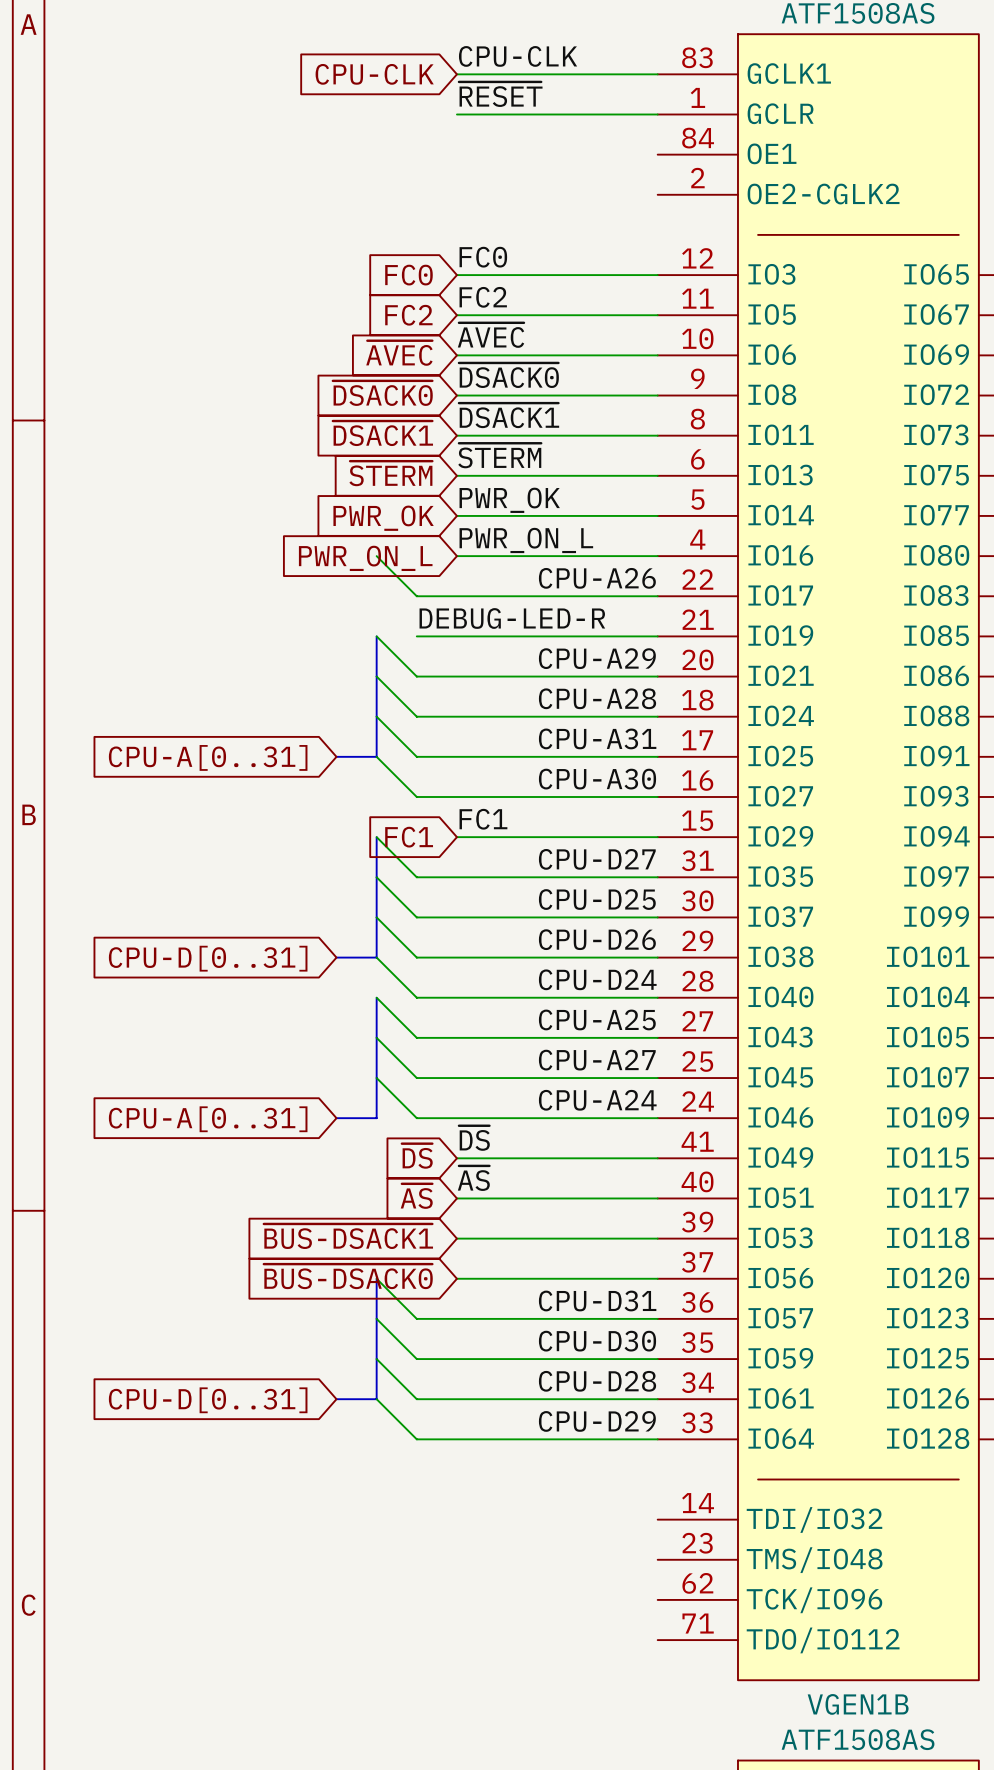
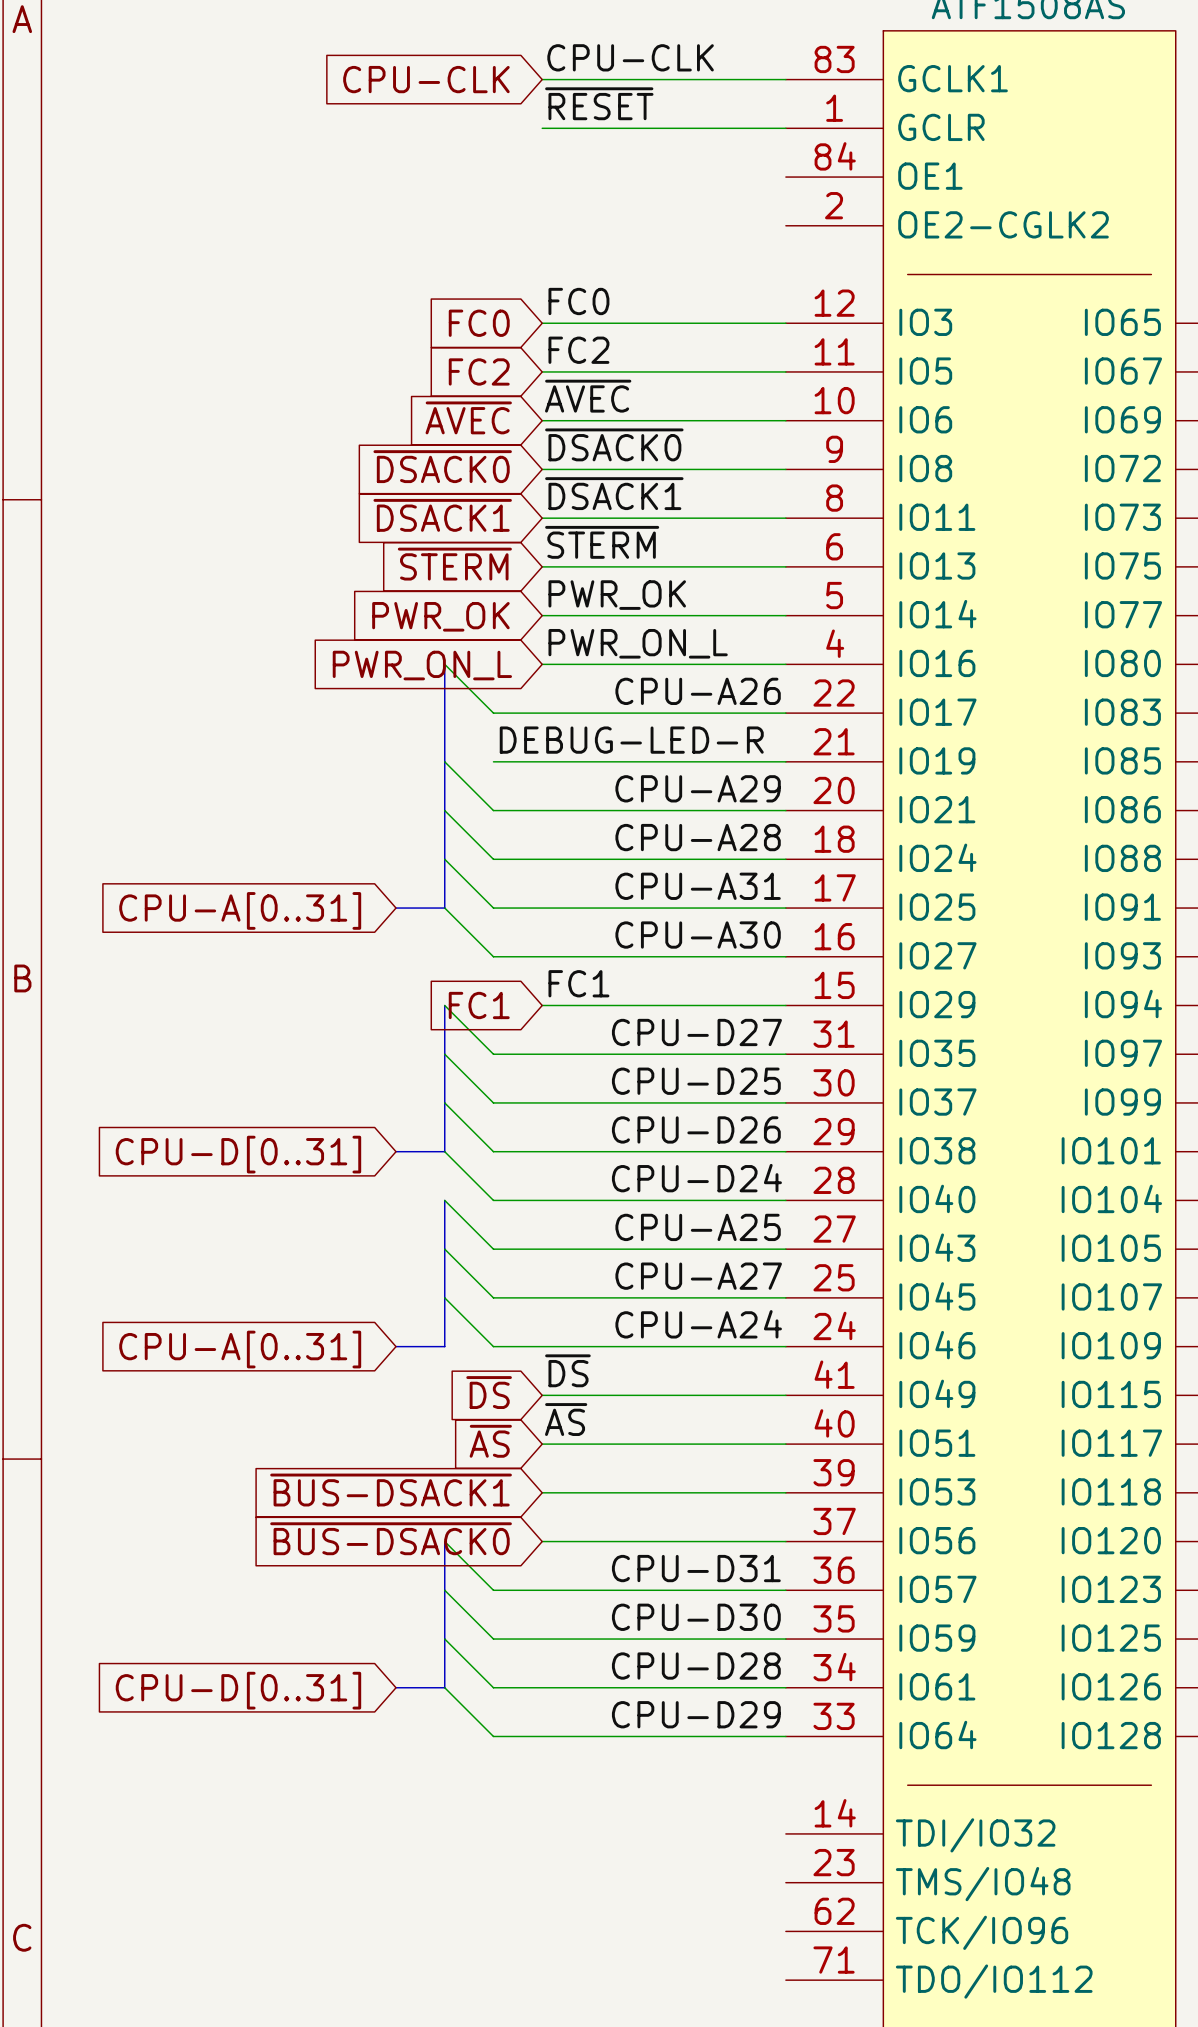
bus: none -> (444, 664) (444, 761)

